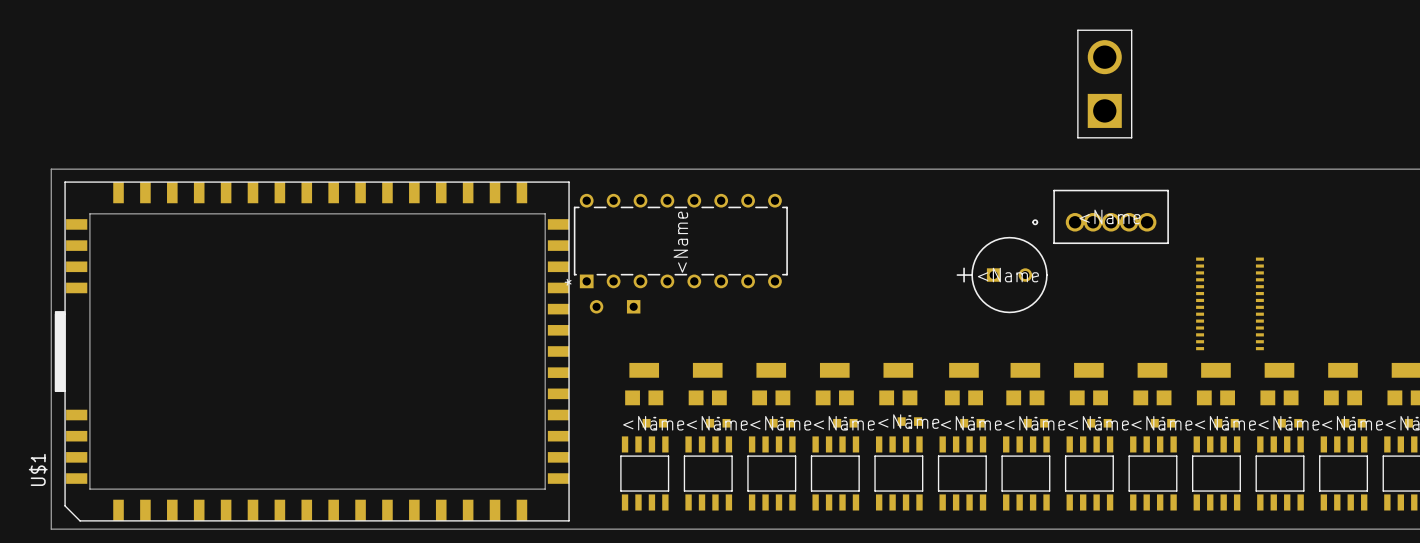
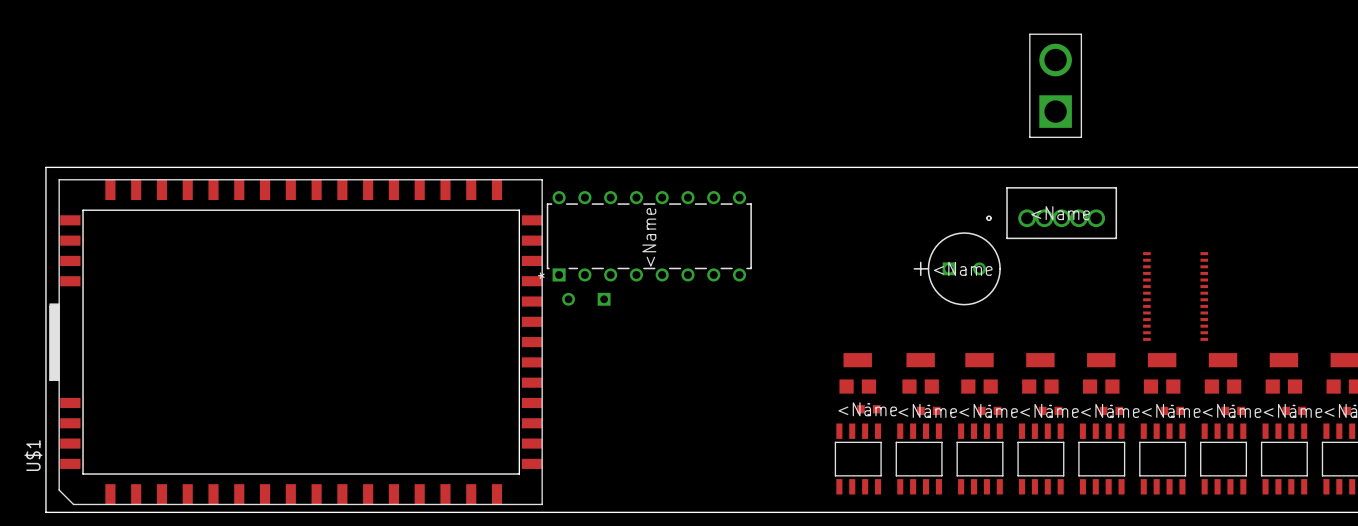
part: (644, 384) -> none
part: (707, 384) -> none
part: (771, 384) -> none
part: (834, 384) -> none
part: (654, 423) -> none
part: (718, 423) -> none
part: (781, 423) -> none
part: (845, 423) -> none
part: (644, 473) -> none
part: (708, 473) -> none
part: (771, 473) -> none
part: (835, 473) -> none

